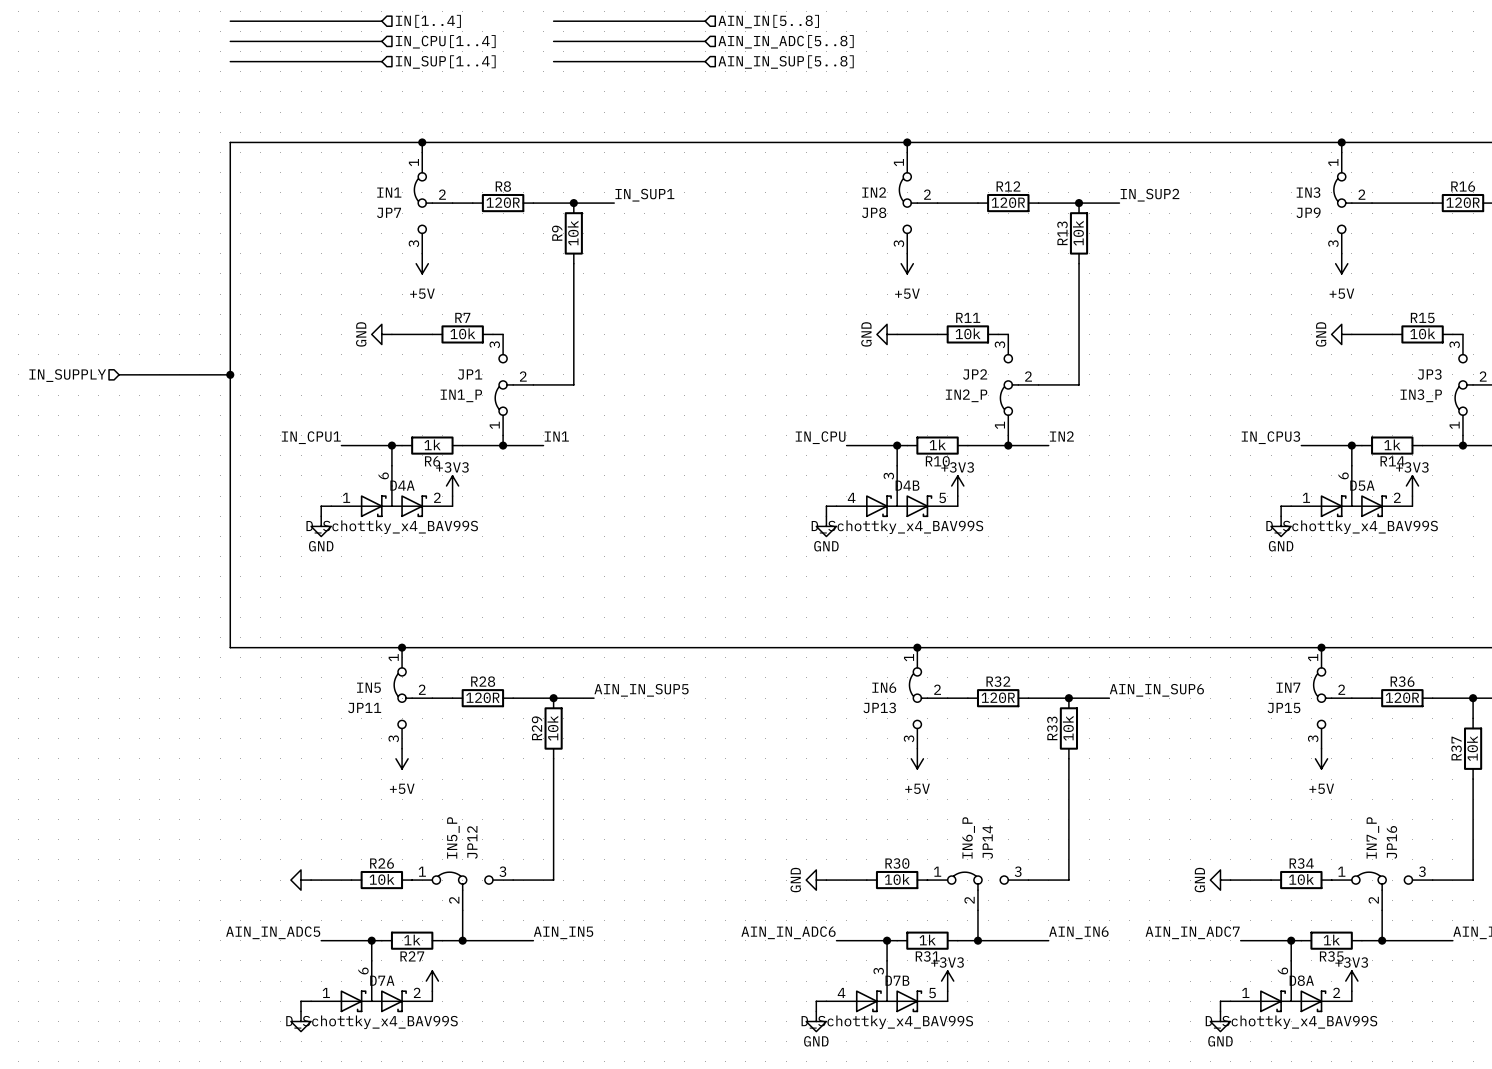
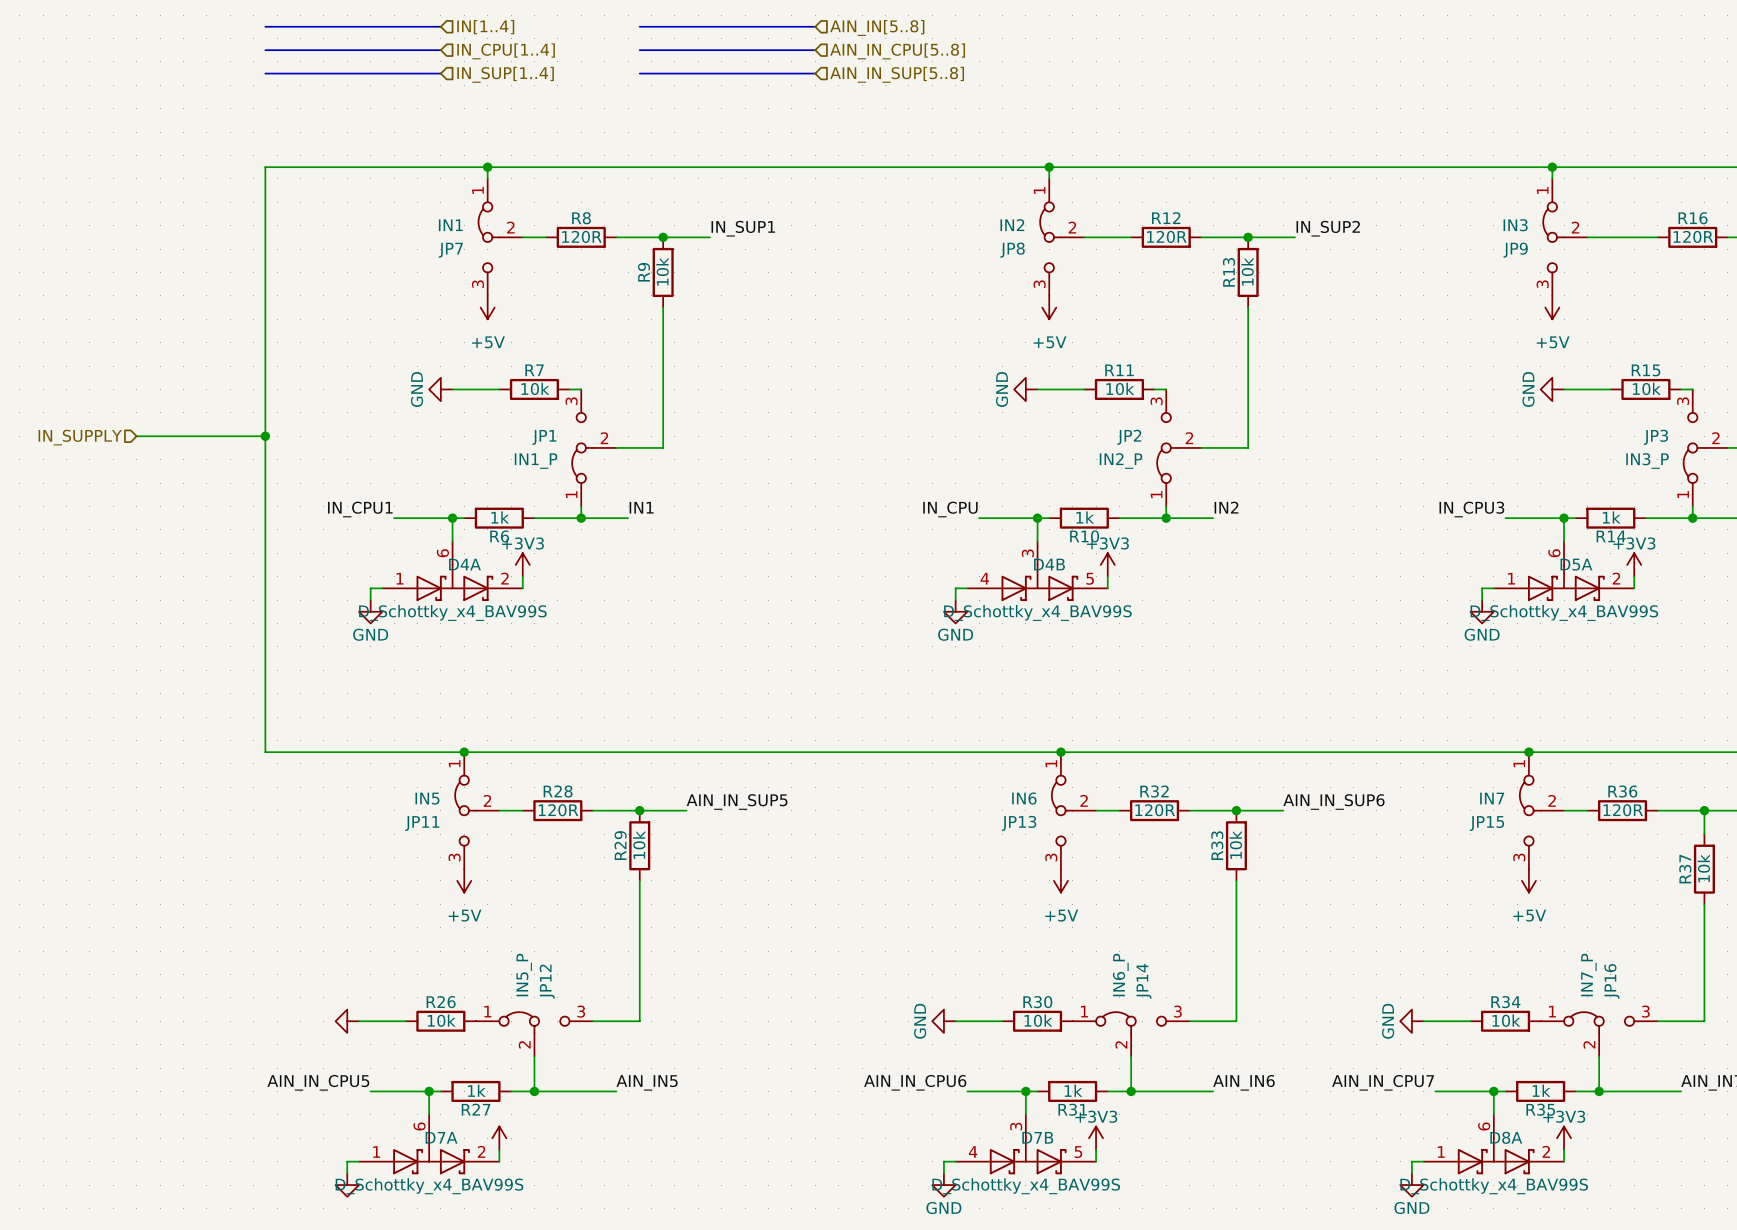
hierarchical label: AIN_IN_ADC[5..8] (786, 41) -> AIN_IN_CPU[5..8] (897, 51)
label: AIN_IN_ADC5 (273, 932) -> AIN_IN_CPU5 (318, 1082)
label: AIN_IN_ADC6 (788, 932) -> AIN_IN_CPU6 (915, 1082)
label: AIN_IN_ADC7 (1192, 932) -> AIN_IN_CPU7 (1383, 1082)

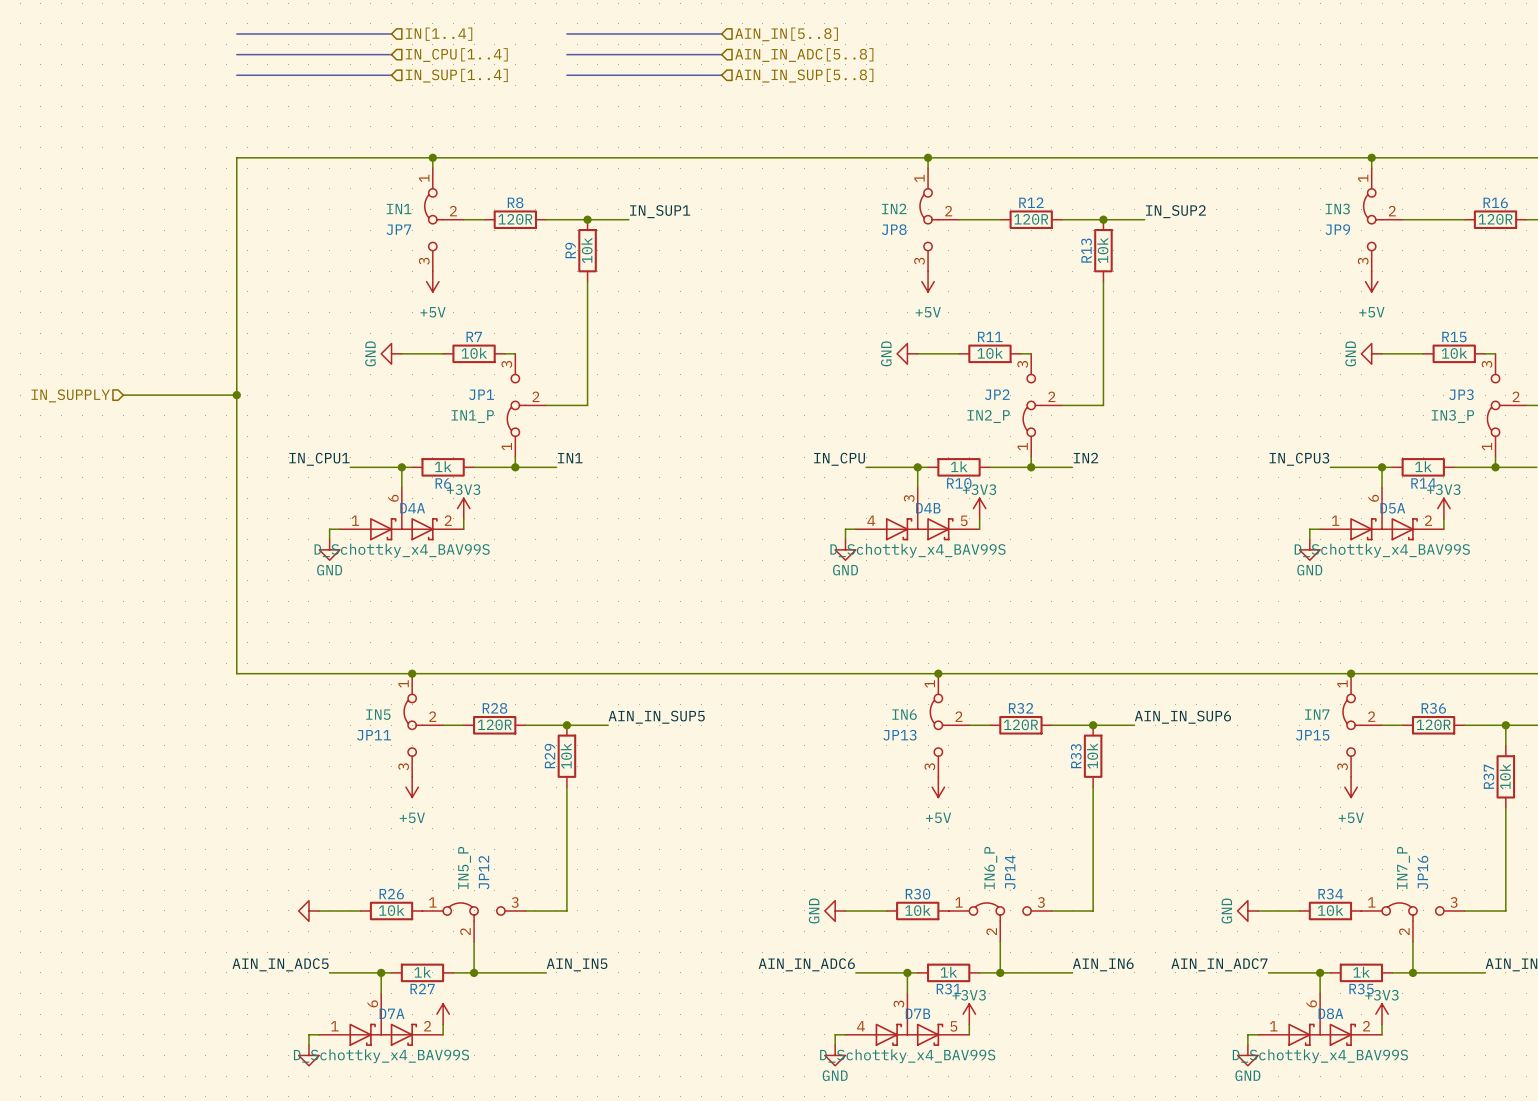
hierarchical label: AIN_IN_CPU[5..8] (897, 51) -> AIN_IN_ADC[5..8] (804, 55)
label: AIN_IN_CPU5 (318, 1082) -> AIN_IN_ADC5 (280, 964)
label: AIN_IN_CPU6 (915, 1082) -> AIN_IN_ADC6 (806, 964)
label: AIN_IN_CPU7 (1383, 1082) -> AIN_IN_ADC7 (1219, 964)

